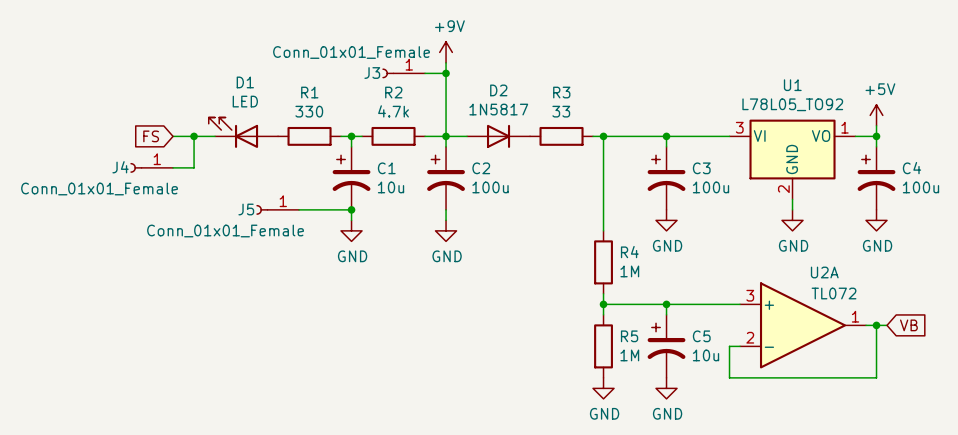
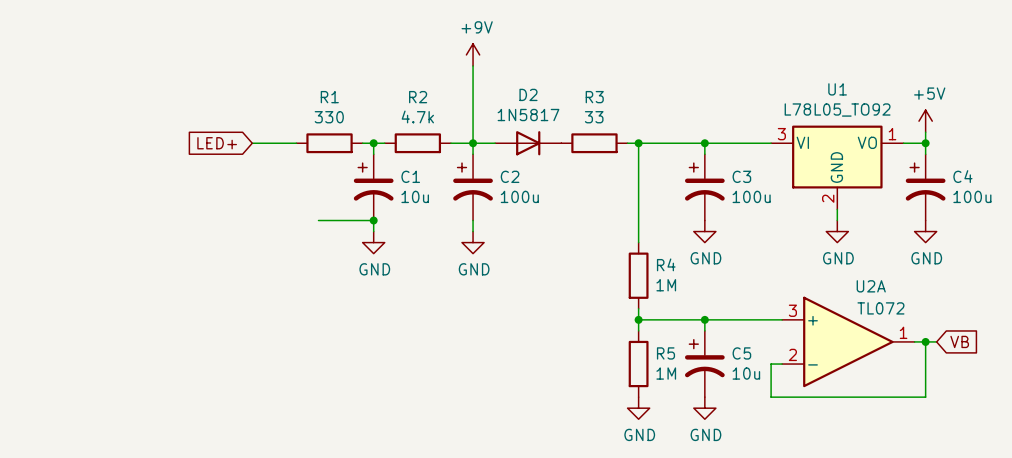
J3: Conn_01x01_Female (403, 73) -> none
wire: (425, 73) (446, 73) -> none
junction: (446, 73) -> none
D1: LED (243, 132) -> none
global label: FS (151, 136) -> none
wire: (194, 136) (194, 167) (173, 167) -> none
junction: (194, 136) -> none
global label: none -> LED+ (217, 143)
J4: Conn_01x01_Female (151, 167) -> none
J5: Conn_01x01_Female (277, 209) -> none

